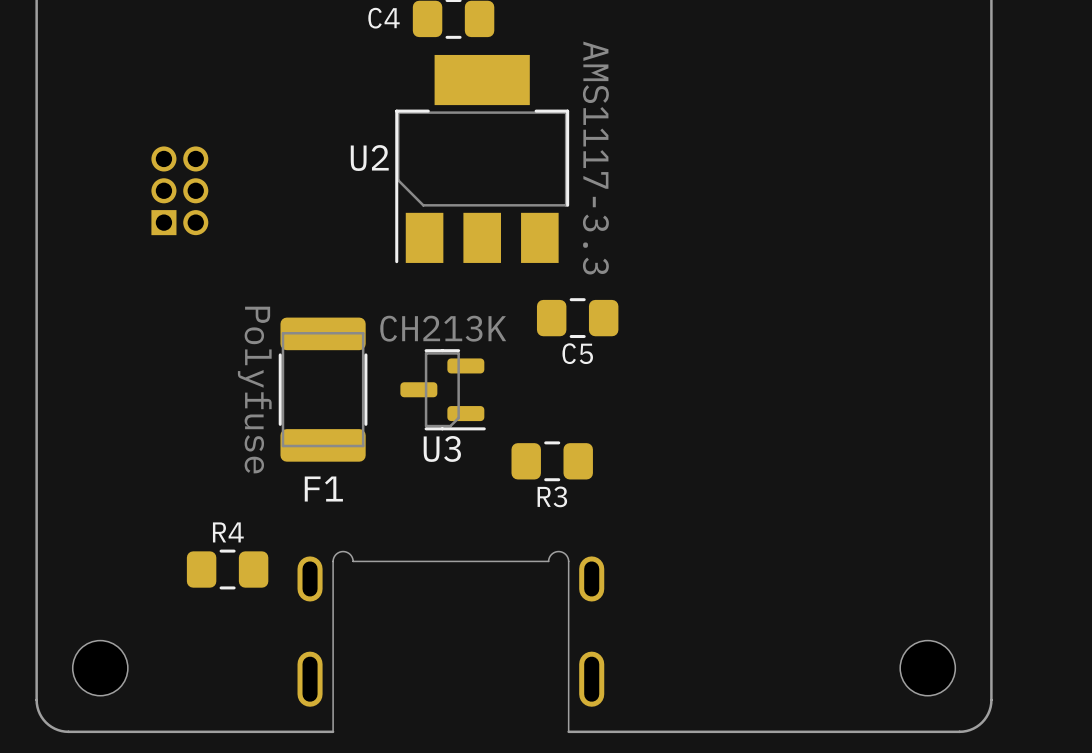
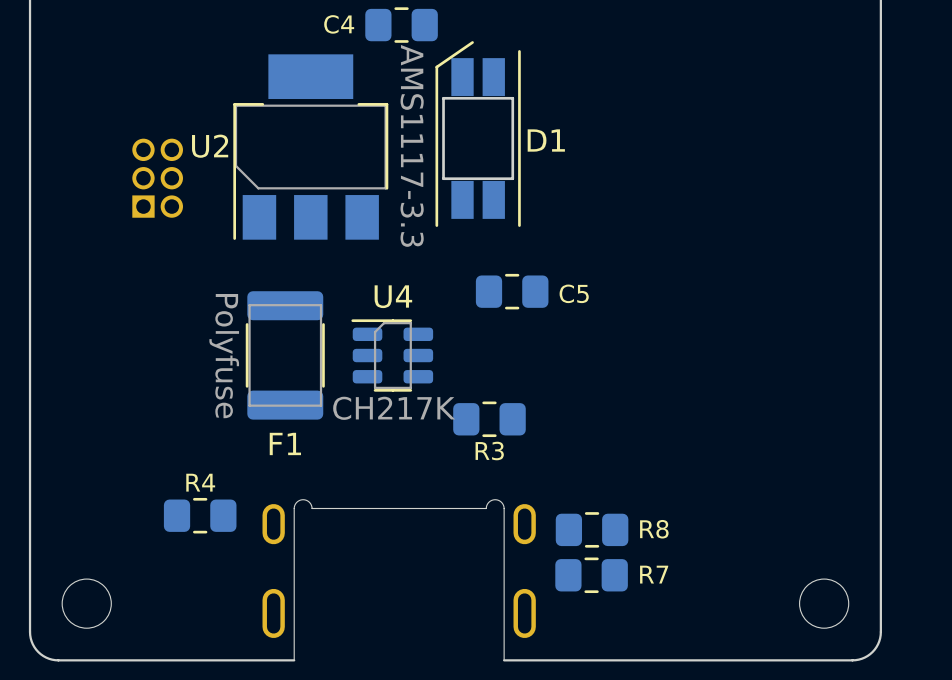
D1: none -> (478, 134)
U2 position: (482, 159) -> (310, 147)
C5 name position: C5 (577, 353) -> C5 (574, 293)
U3: CH213K (443, 389) -> none
U4: none -> CH217K (392, 355)
R8: none -> (592, 529)
R7: none -> (591, 575)

